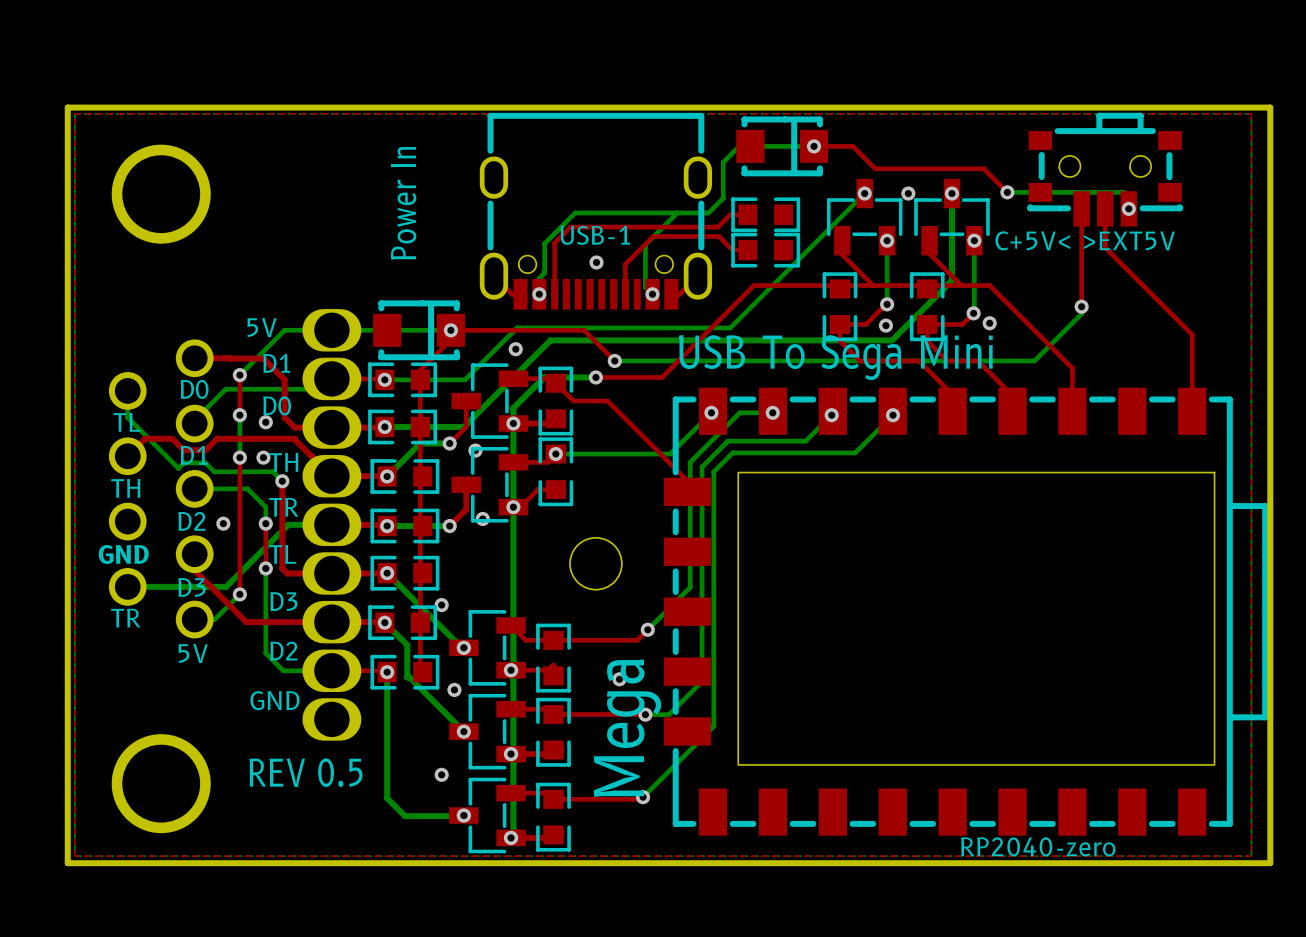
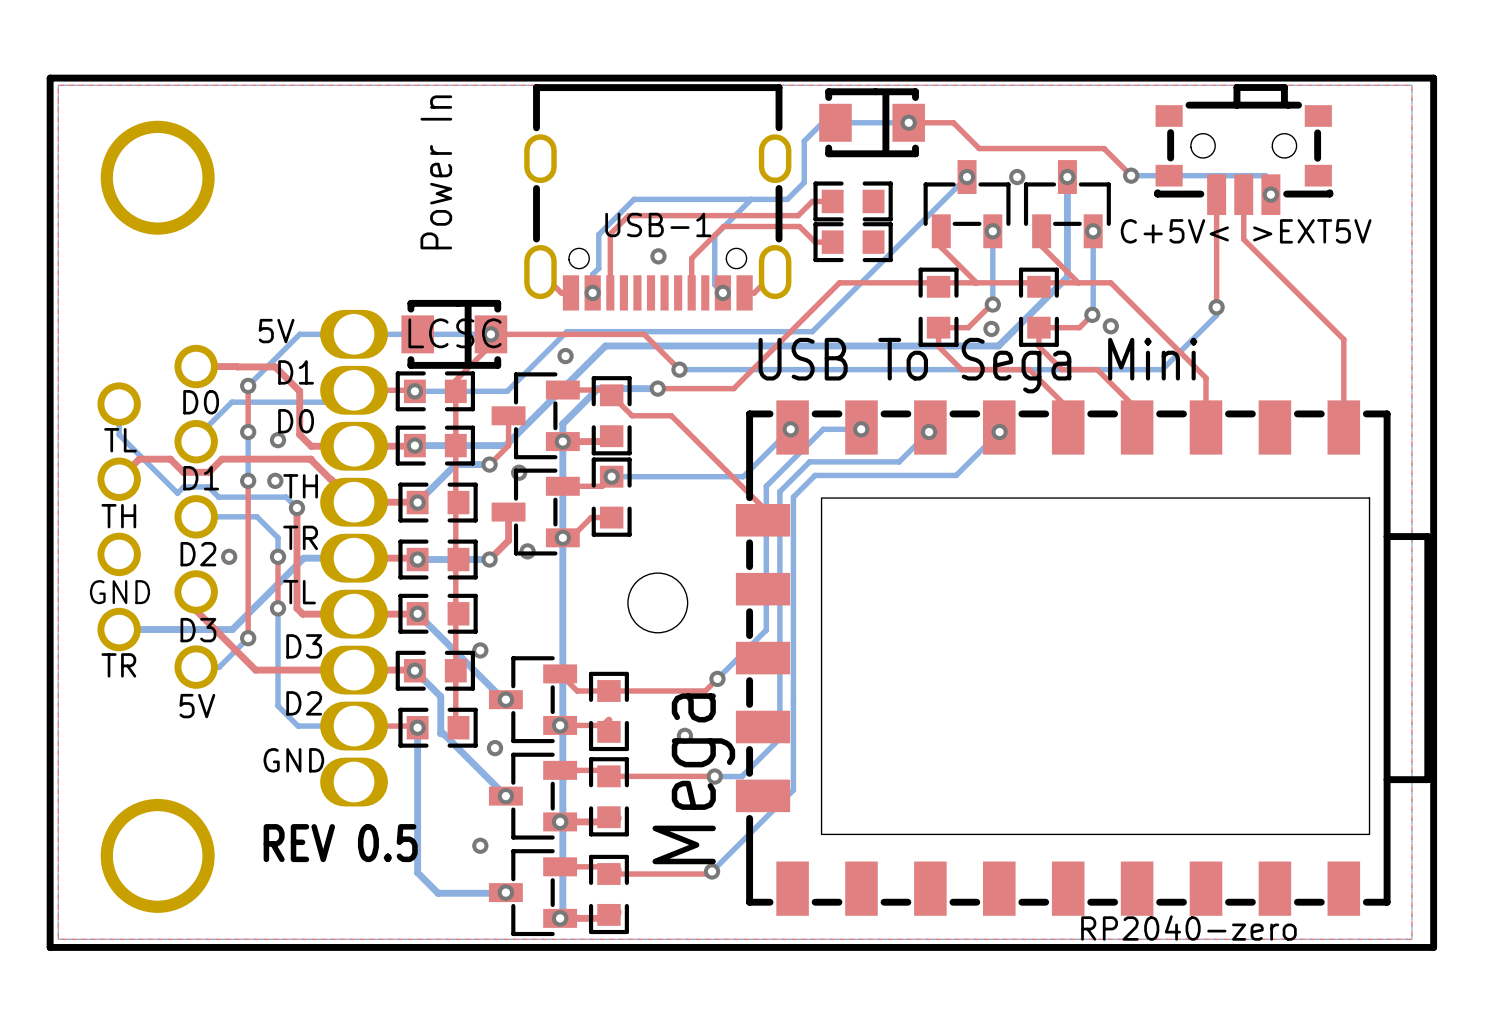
part text: none -> LCSC (454, 333)

